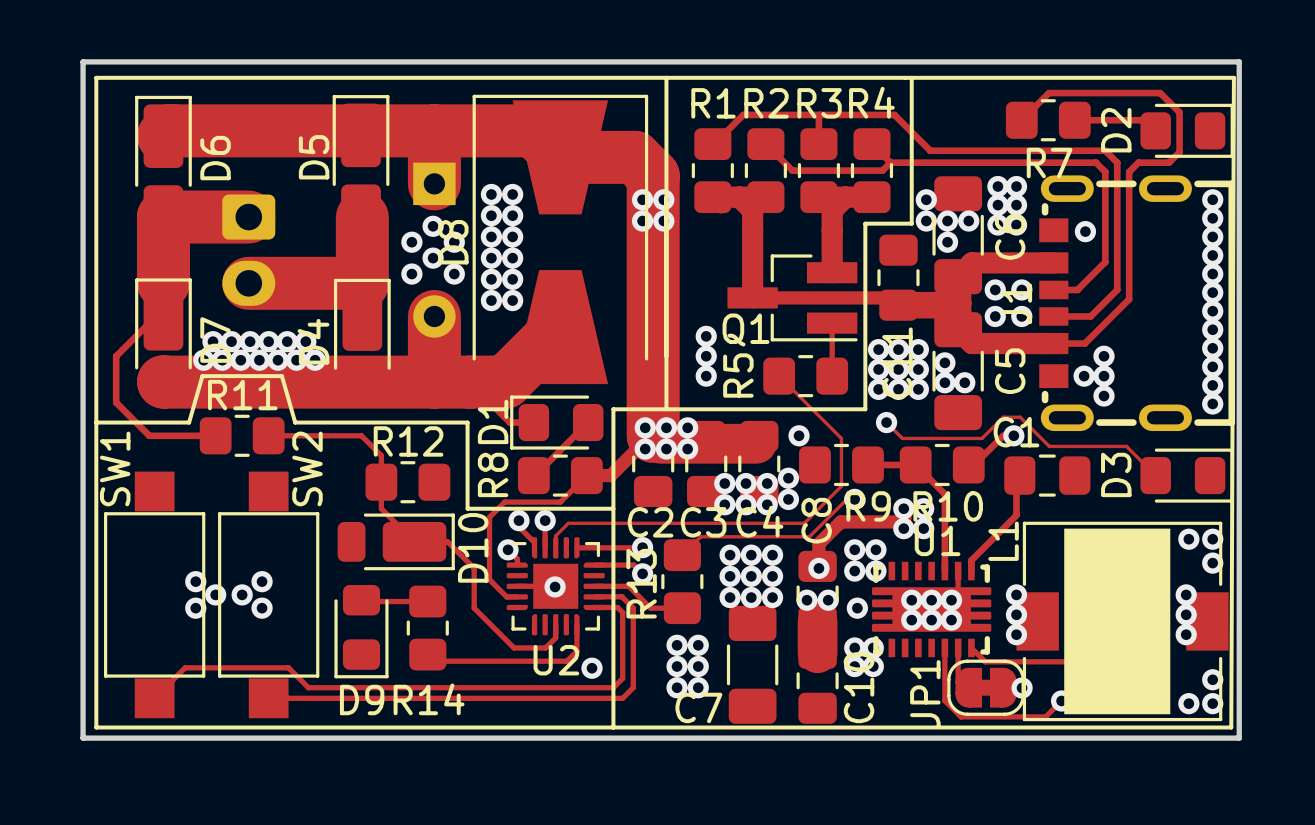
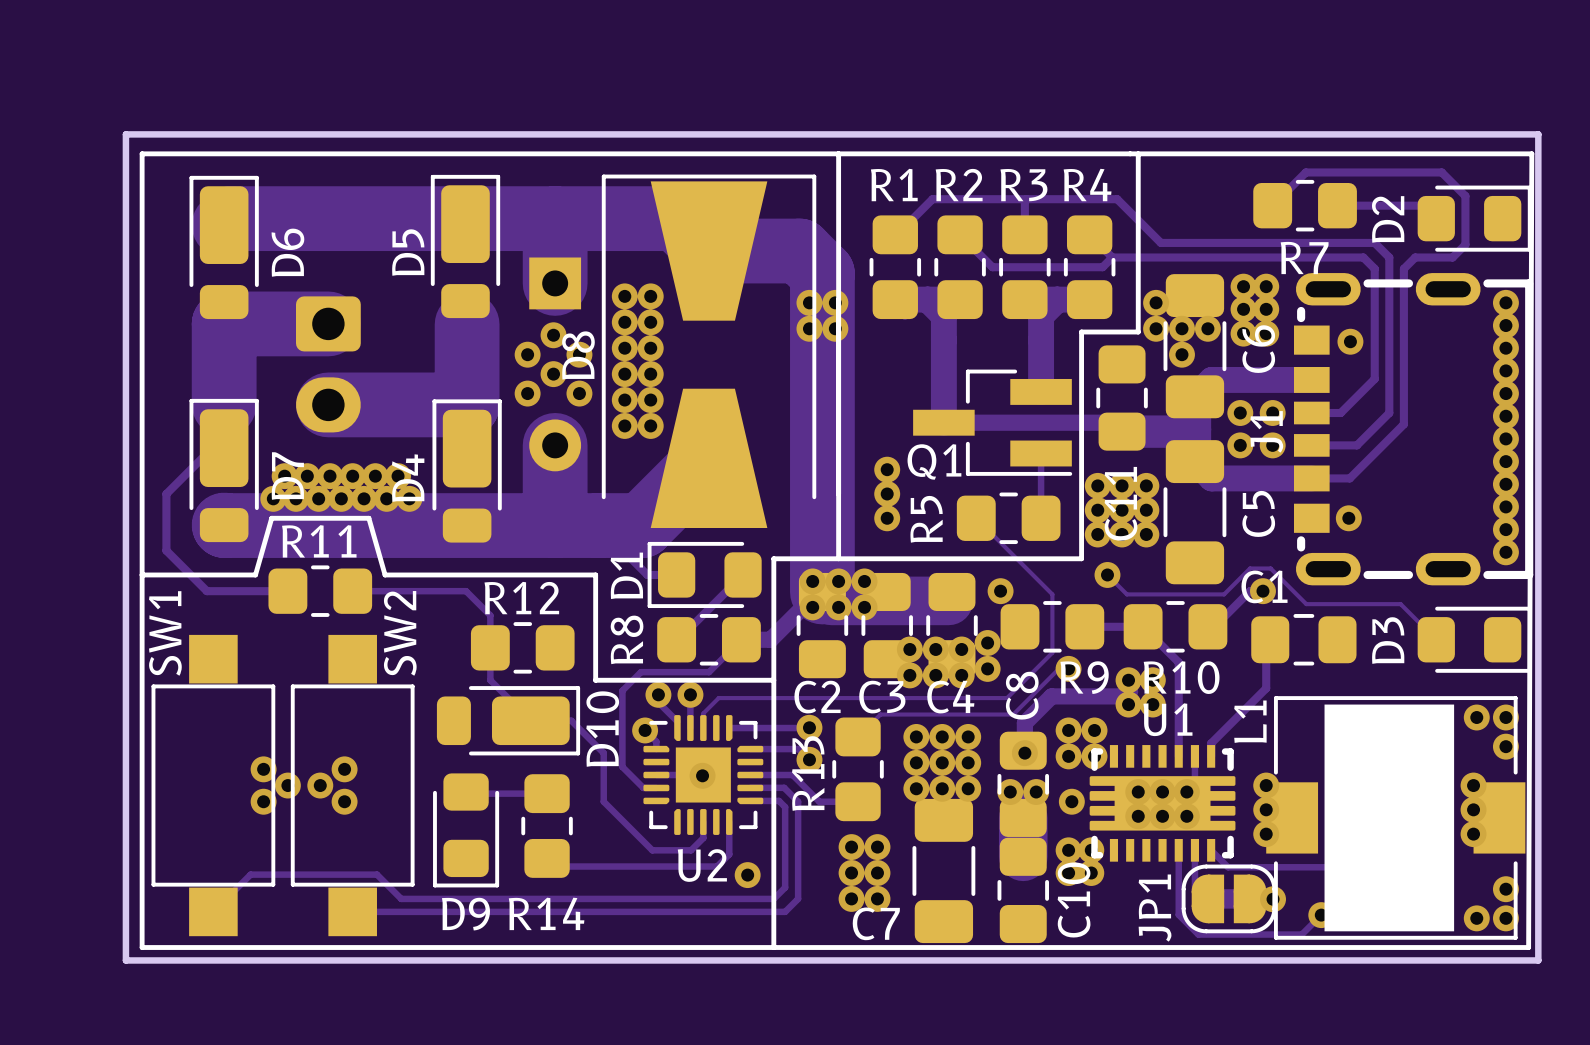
via: (1104, 356) -> none
via: (944, 362) -> none
via: (1104, 376) -> none
via: (944, 382) -> none
via: (964, 382) -> none
via: (1104, 396) -> none

